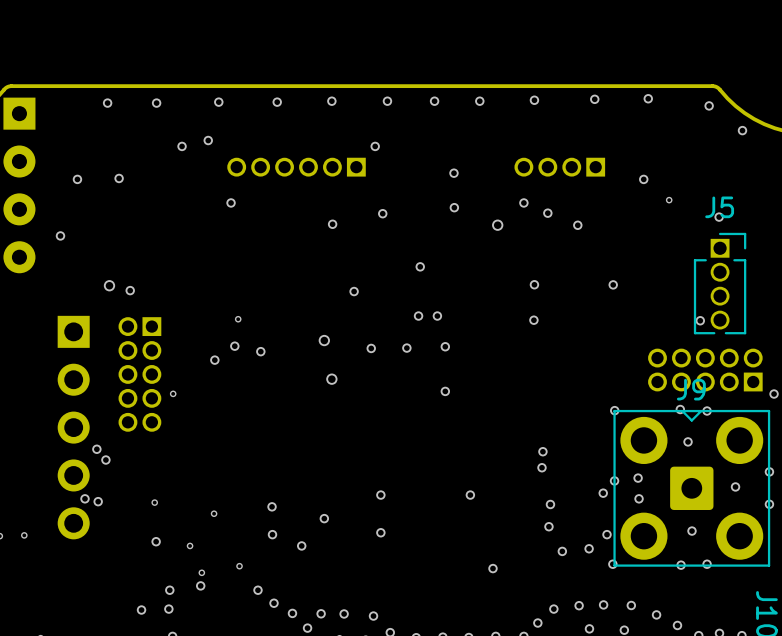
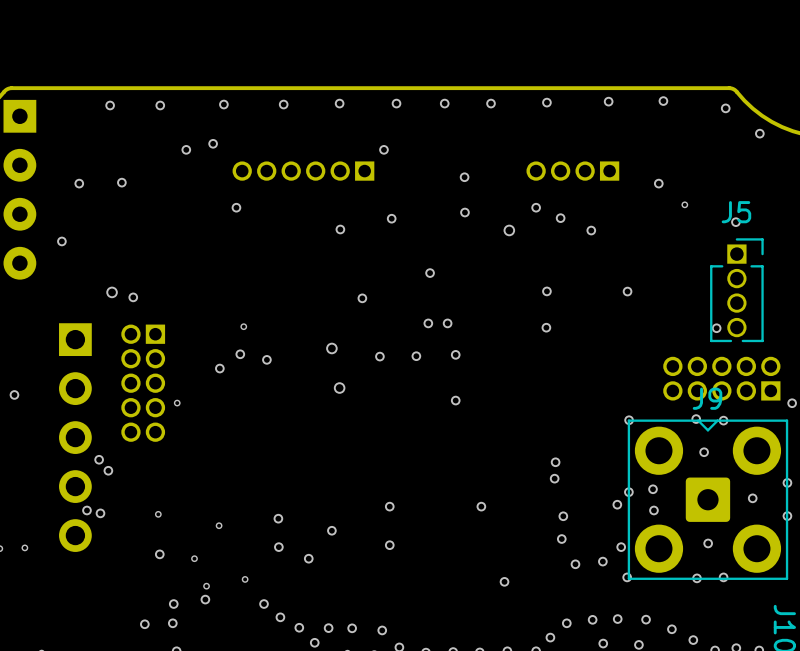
via: none -> (14, 394)

